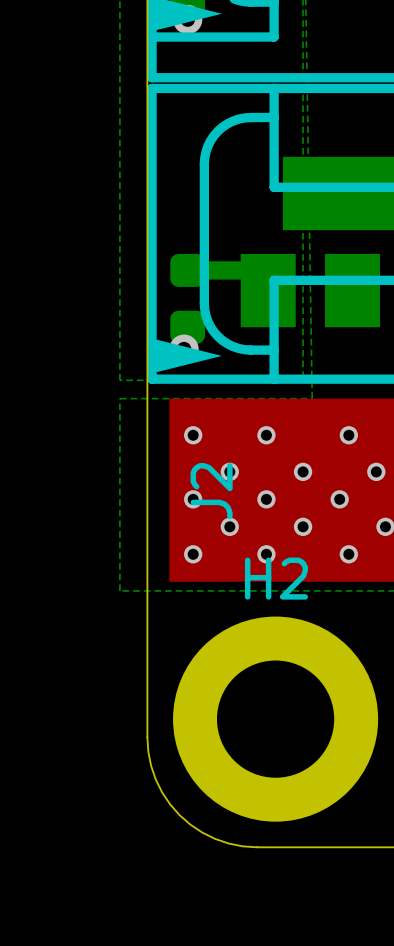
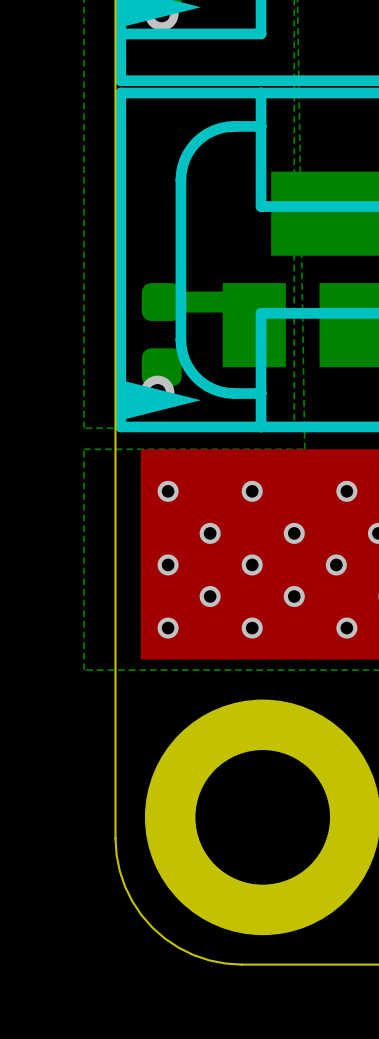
J2 name: J2 (211, 491) -> none
H2 name: H2 (276, 578) -> none

